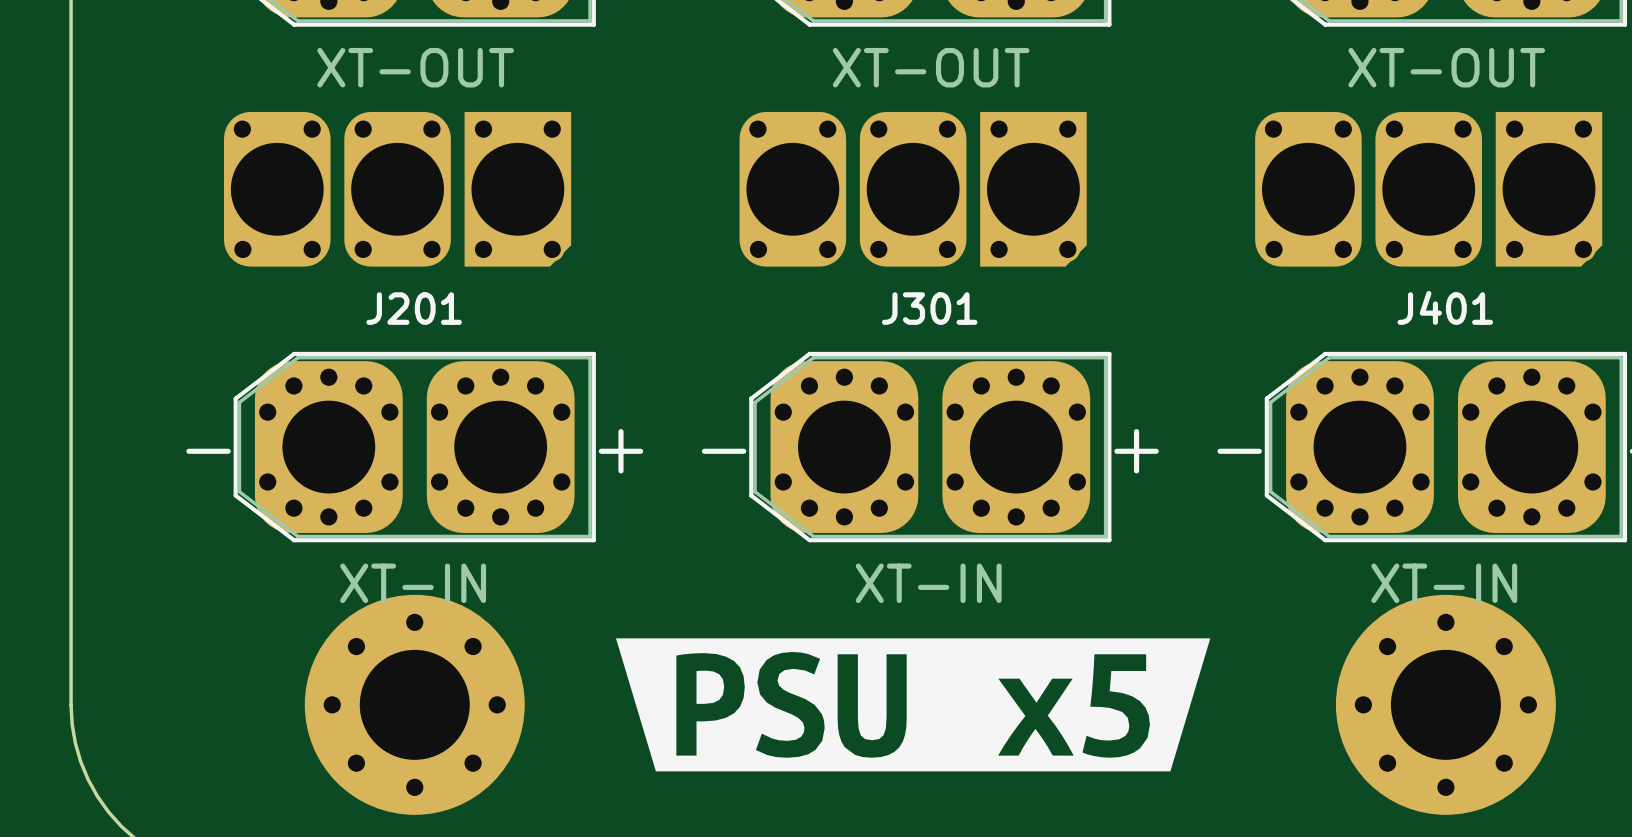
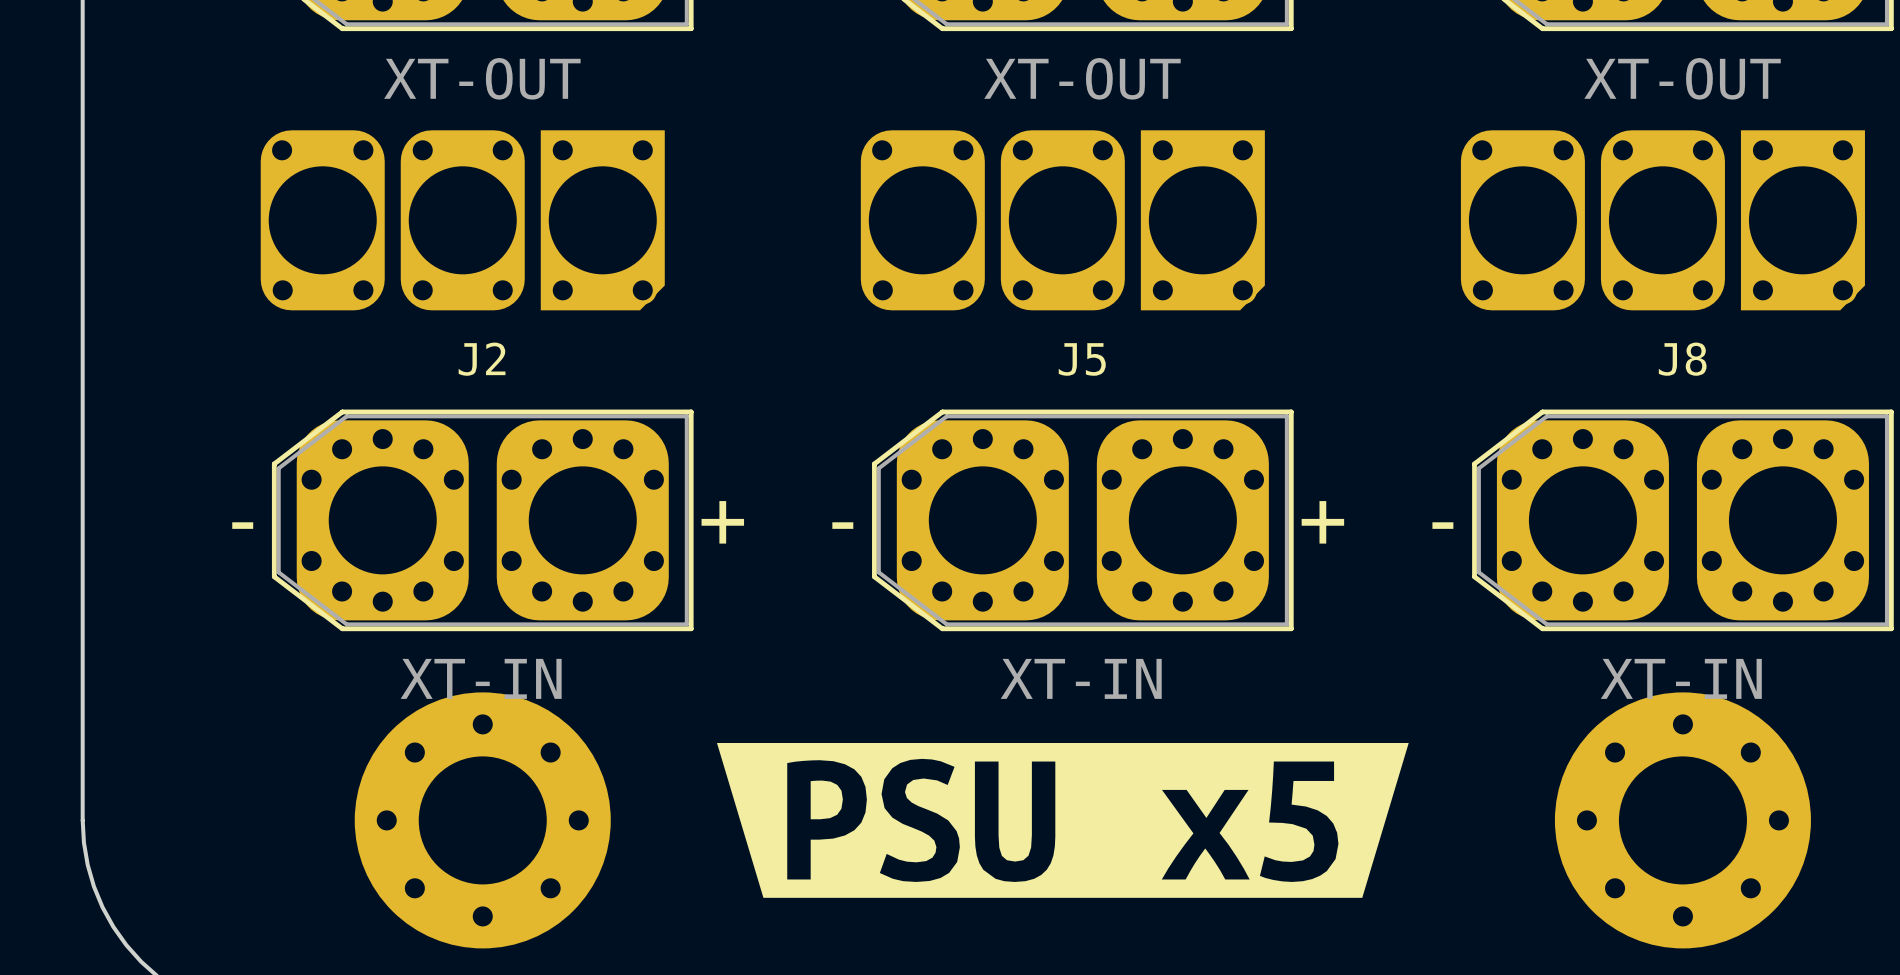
J401 name: J401 (1445, 307) -> J8 (1682, 359)
J201 name: J201 (414, 308) -> J2 (482, 359)
J301 name: J301 (929, 308) -> J5 (1082, 359)

